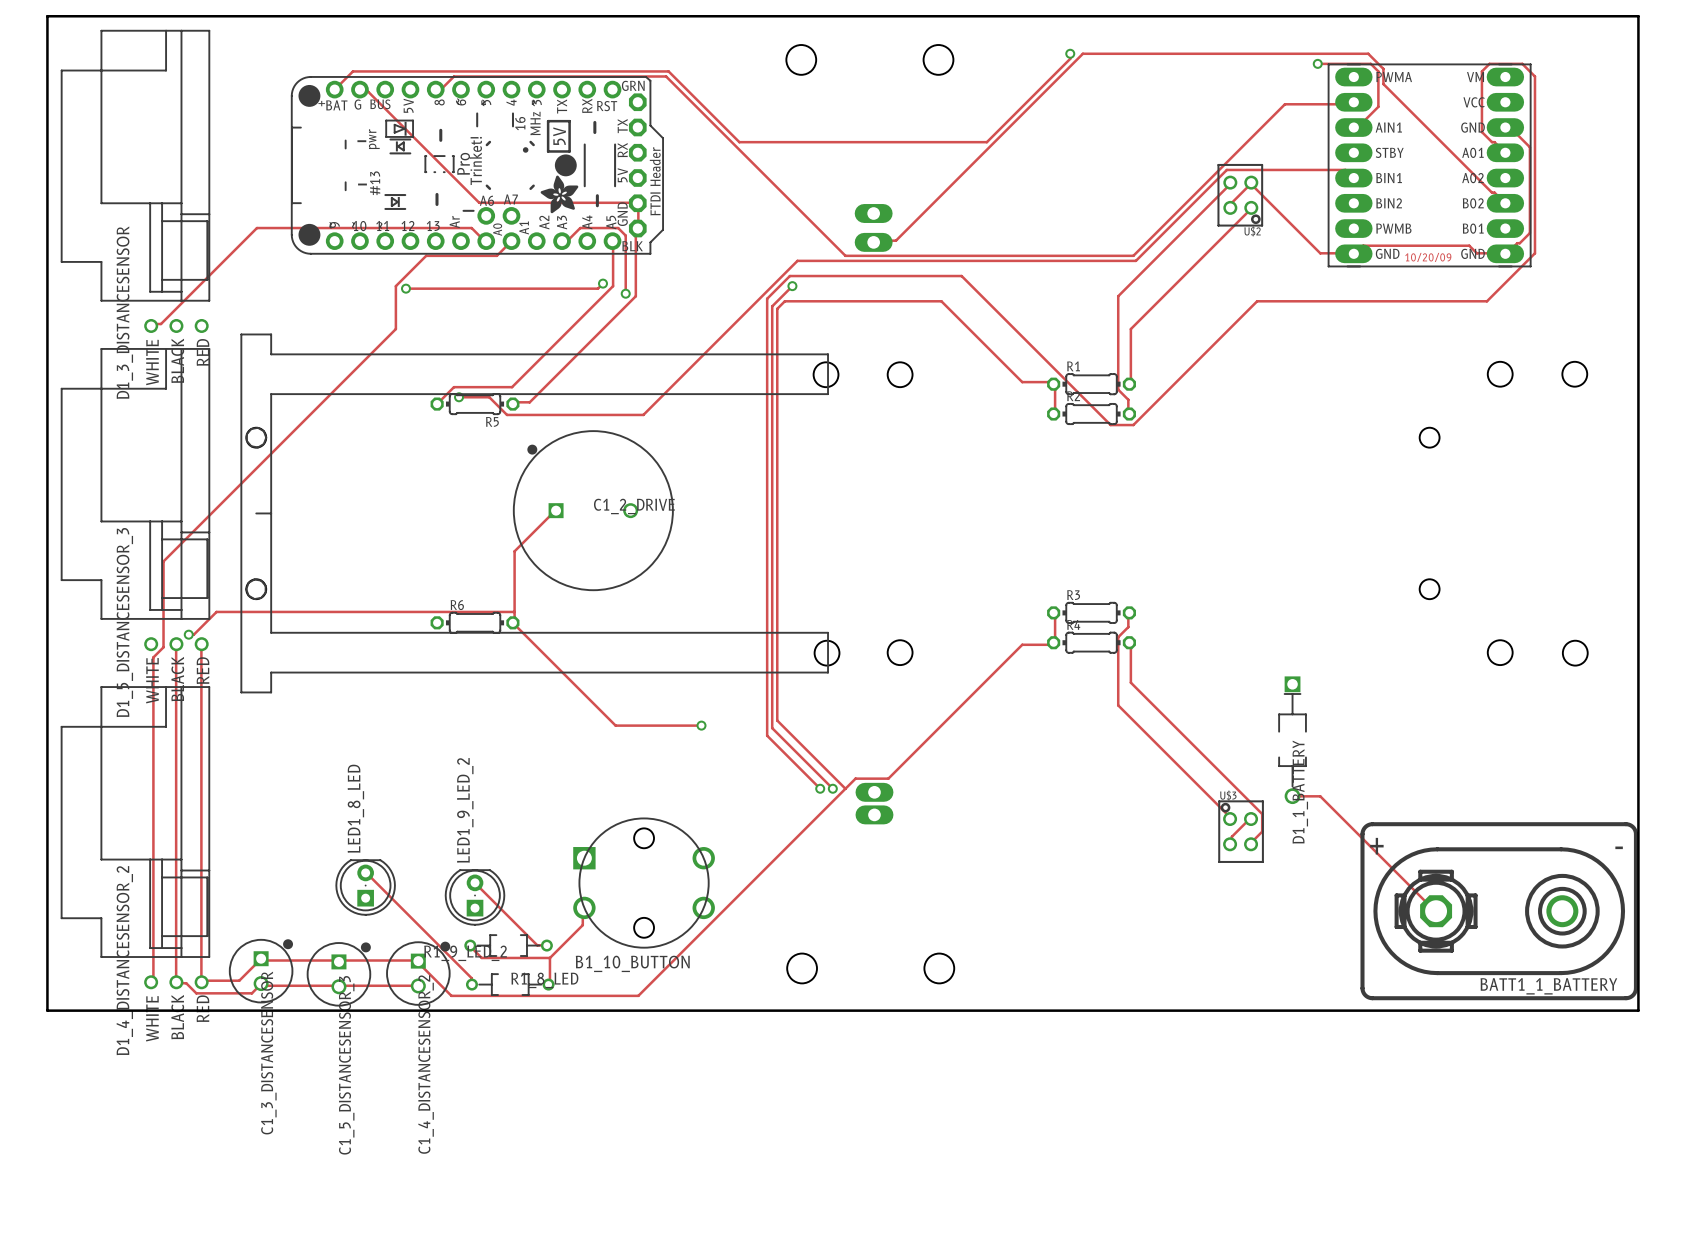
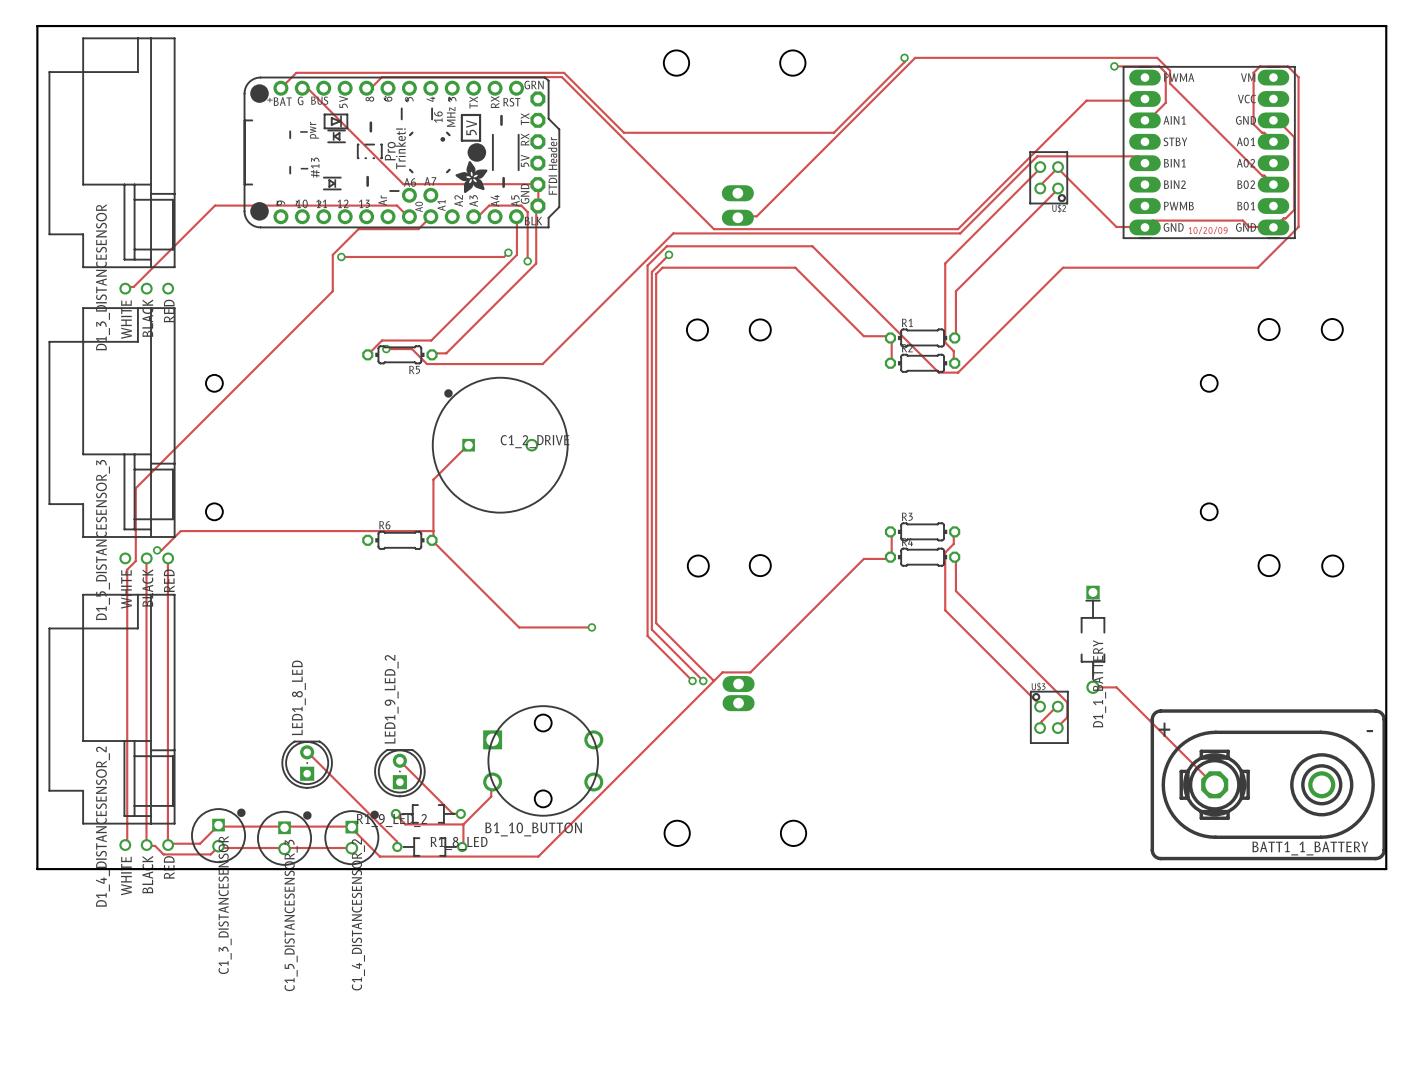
drawing: [241, 334, 829, 693] -> none

